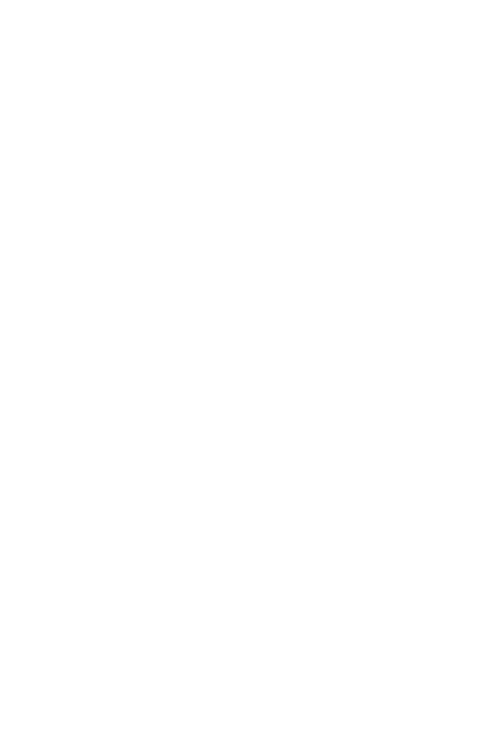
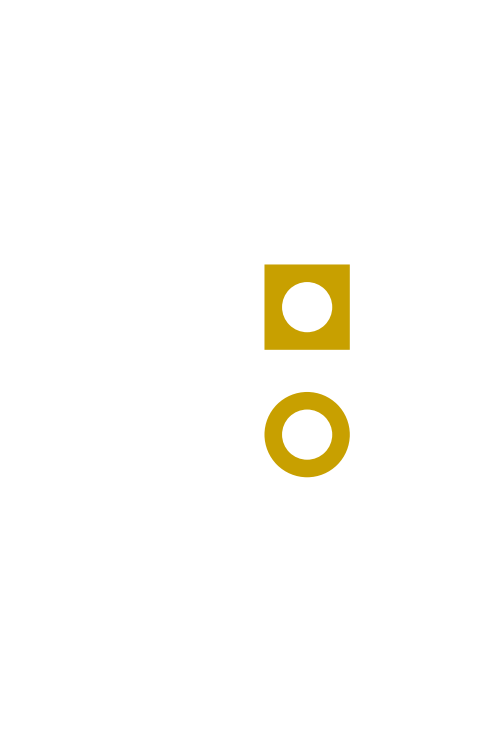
part: none -> (307, 370)

